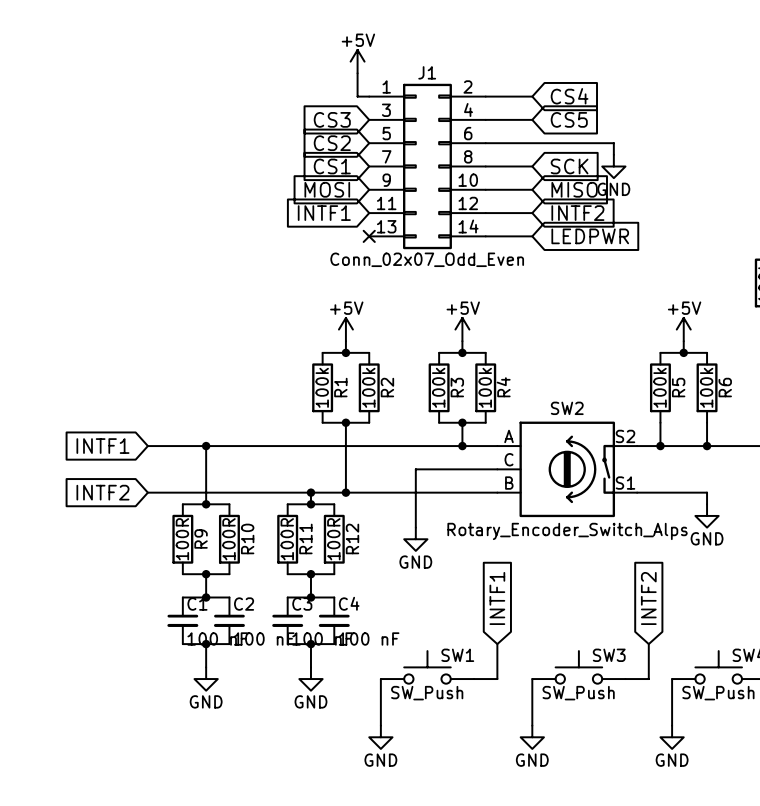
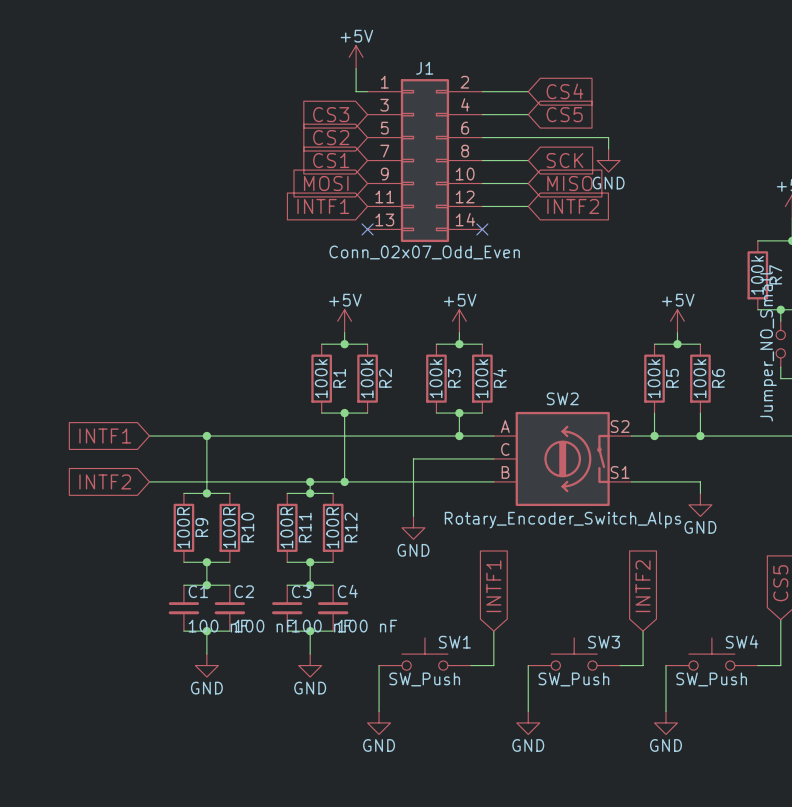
wire: (485, 236) (532, 236) -> none
no-connect mark: none -> (482, 229)
global label: LEDPWR (590, 236) -> none

